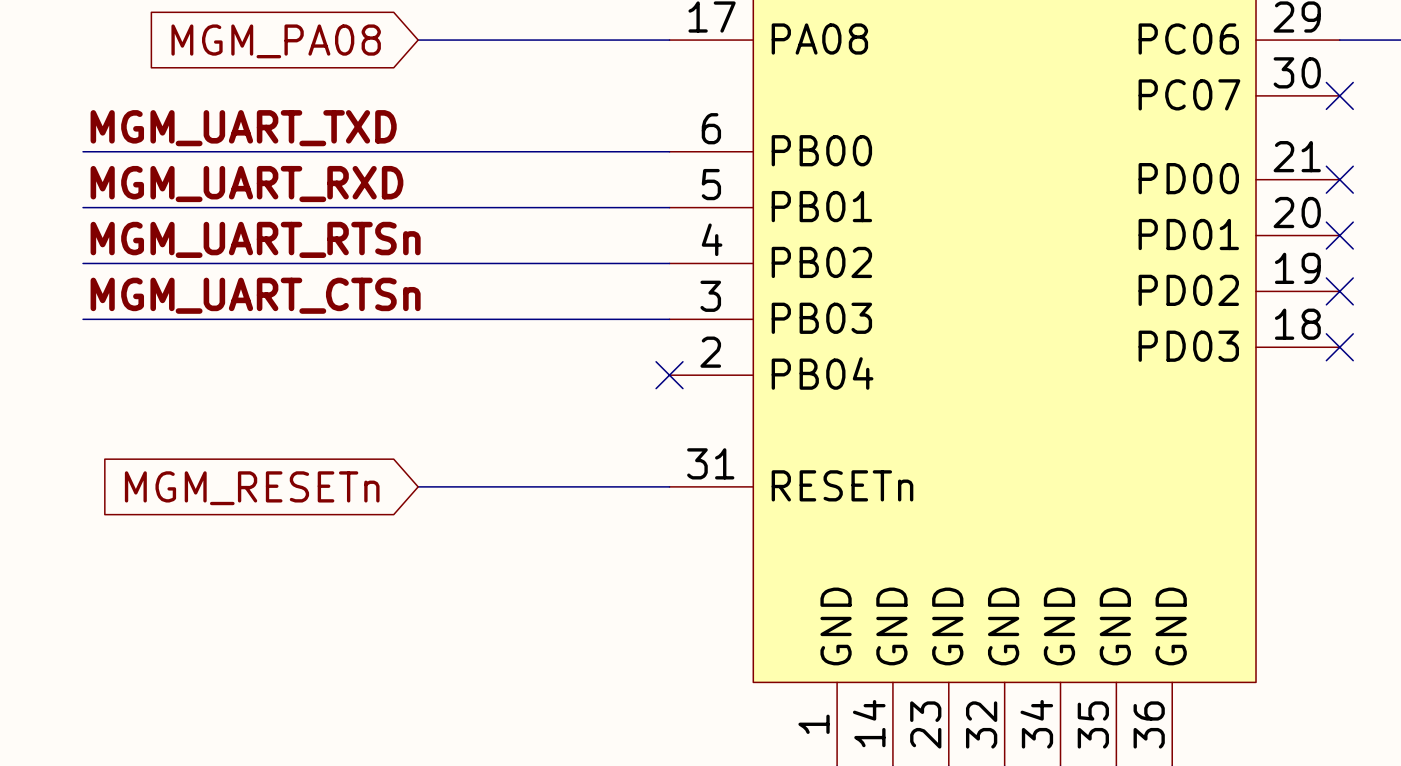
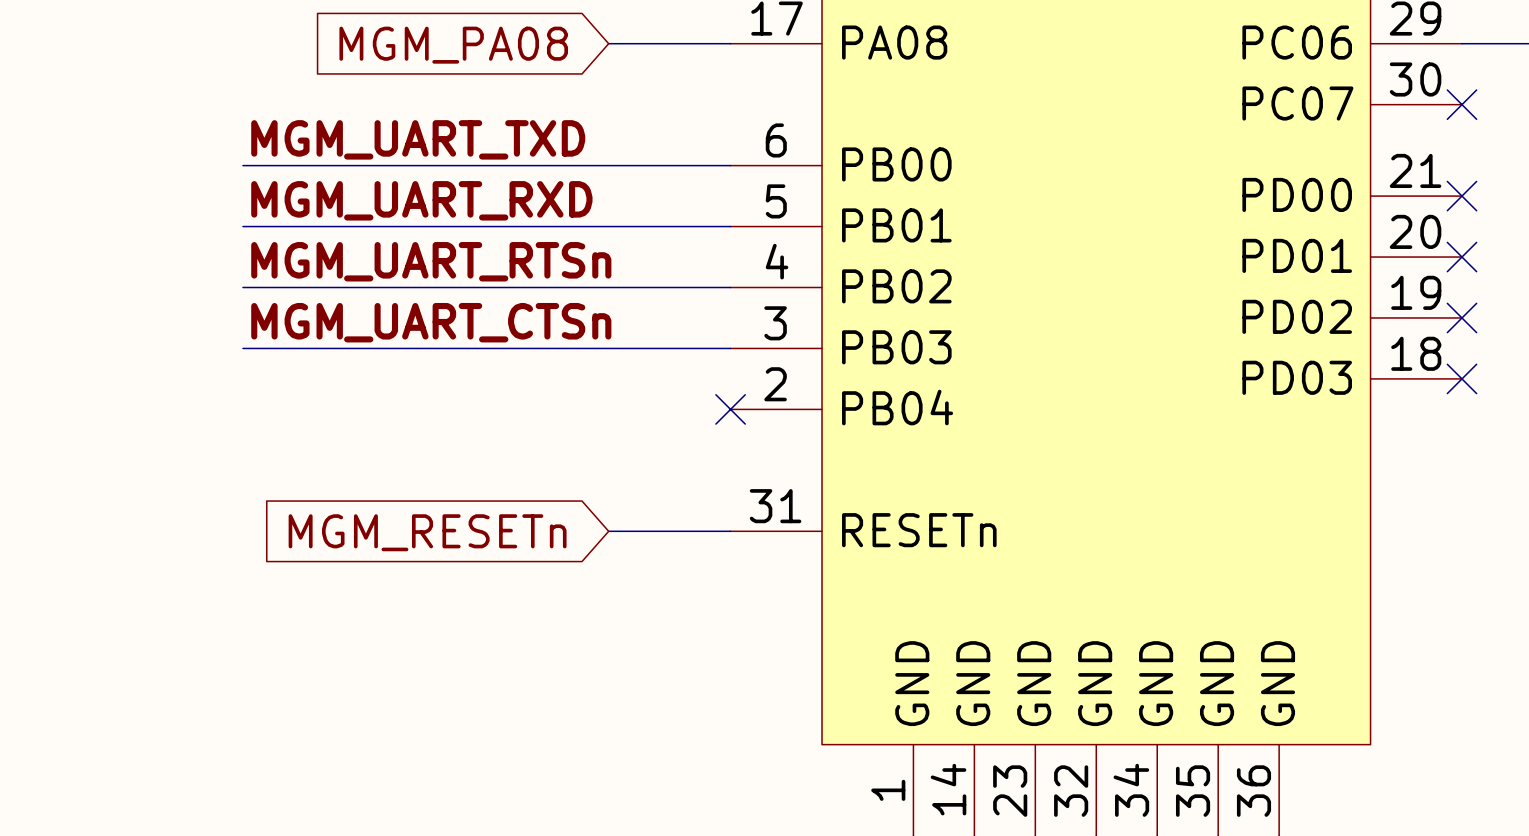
wire: (418, 40) (557, 40) -> none
global label position: MGM_PA08 (276, 41) -> MGM_PA08 (453, 45)
label position: MGM_UART_TXD (243, 128) -> MGM_UART_TXD (418, 139)
wire: (83, 151) (222, 151) -> none
label position: MGM_UART_RXD (246, 184) -> MGM_UART_RXD (421, 200)
wire: (83, 207) (222, 207) -> none
label position: MGM_UART_RTSn (255, 239) -> MGM_UART_RTSn (431, 261)
wire: (83, 263) (222, 263) -> none
label position: MGM_UART_CTSn (255, 295) -> MGM_UART_CTSn (431, 322)
wire: (83, 319) (222, 319) -> none
wire: (418, 486) (557, 486) -> none
global label position: MGM_RESETn (252, 488) -> MGM_RESETn (427, 532)

